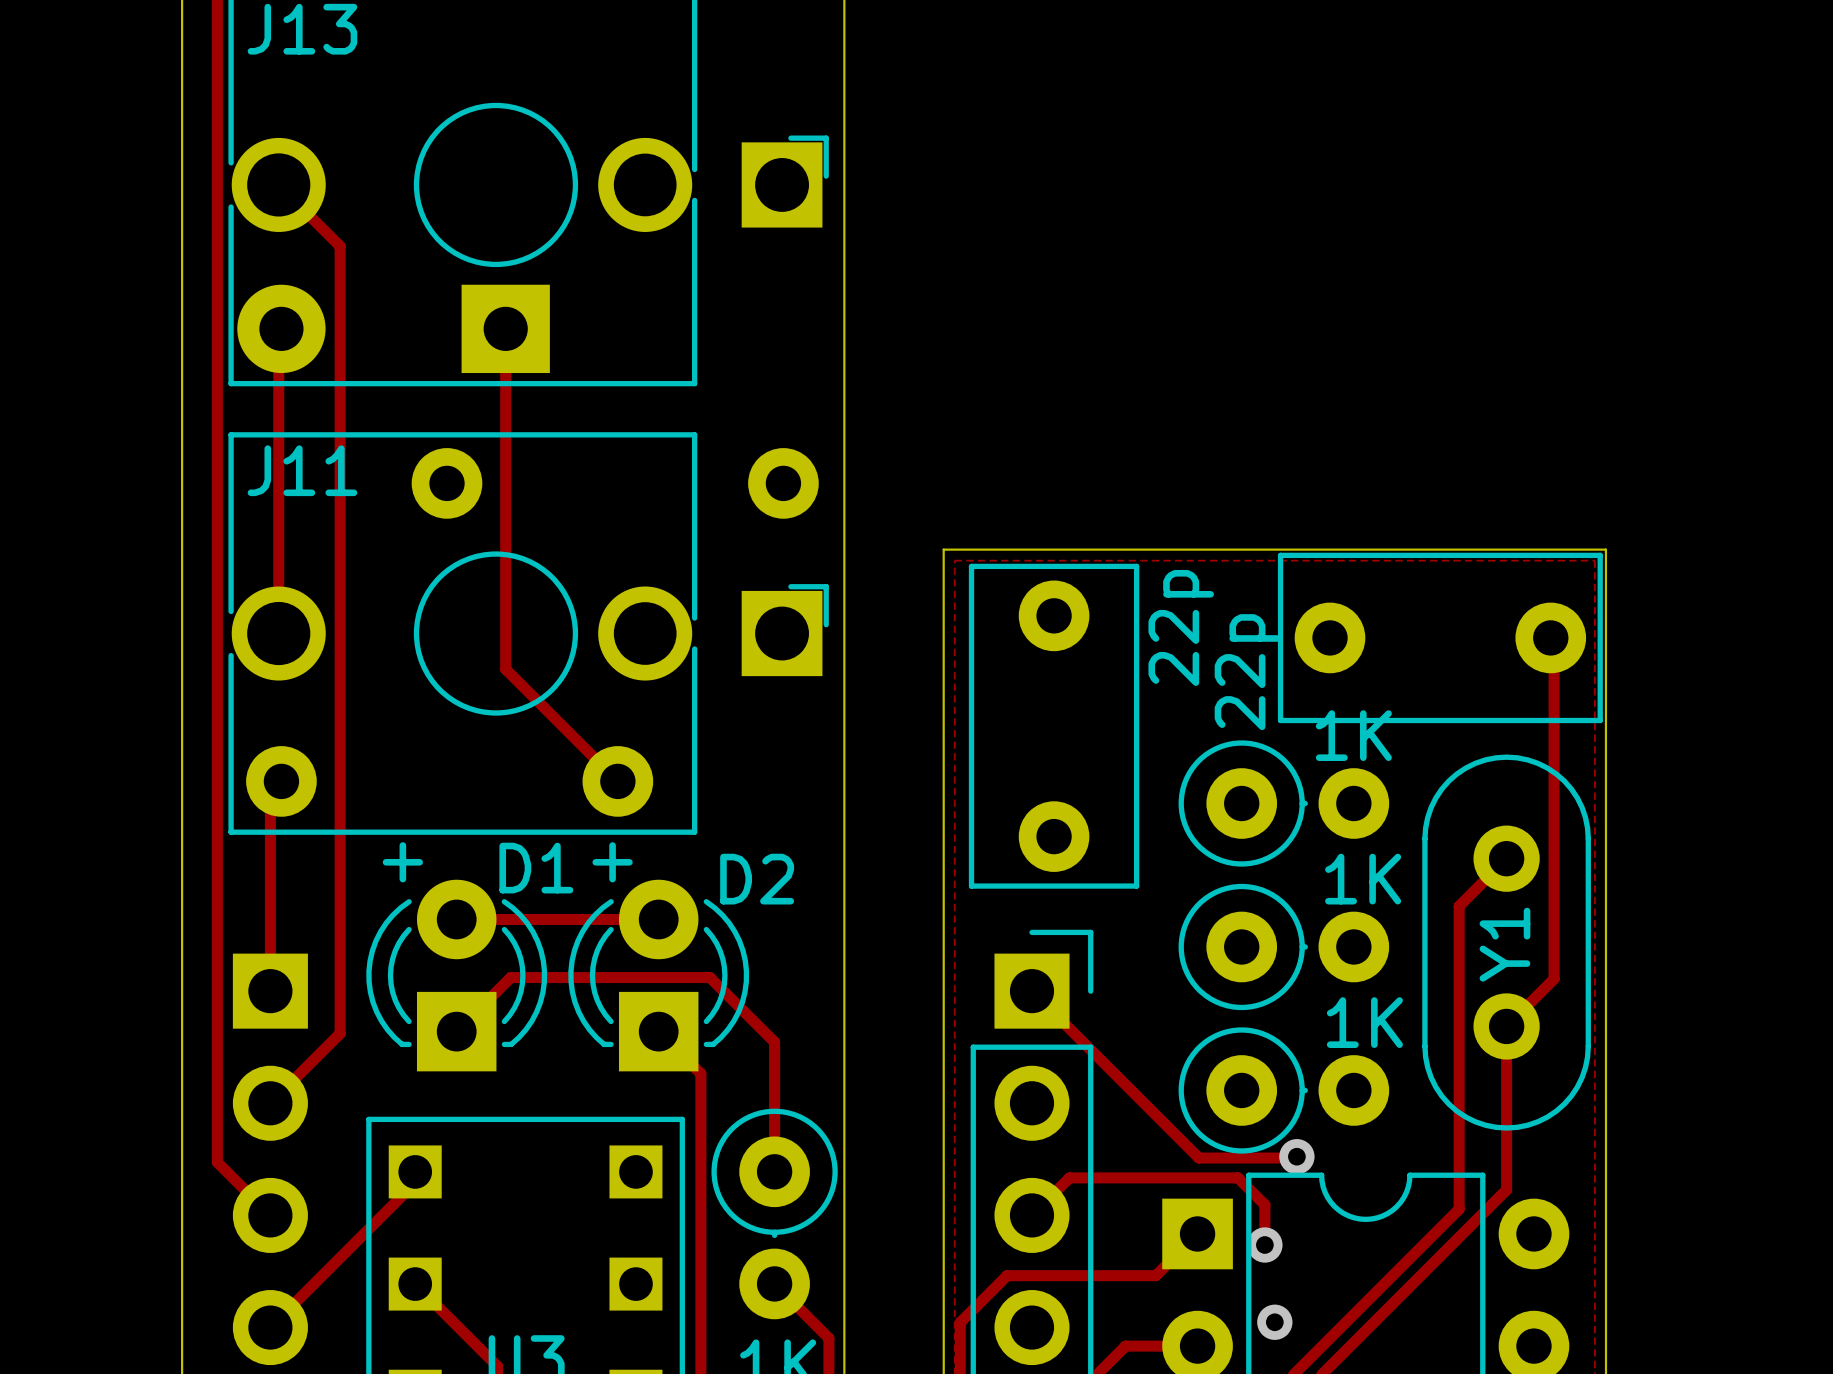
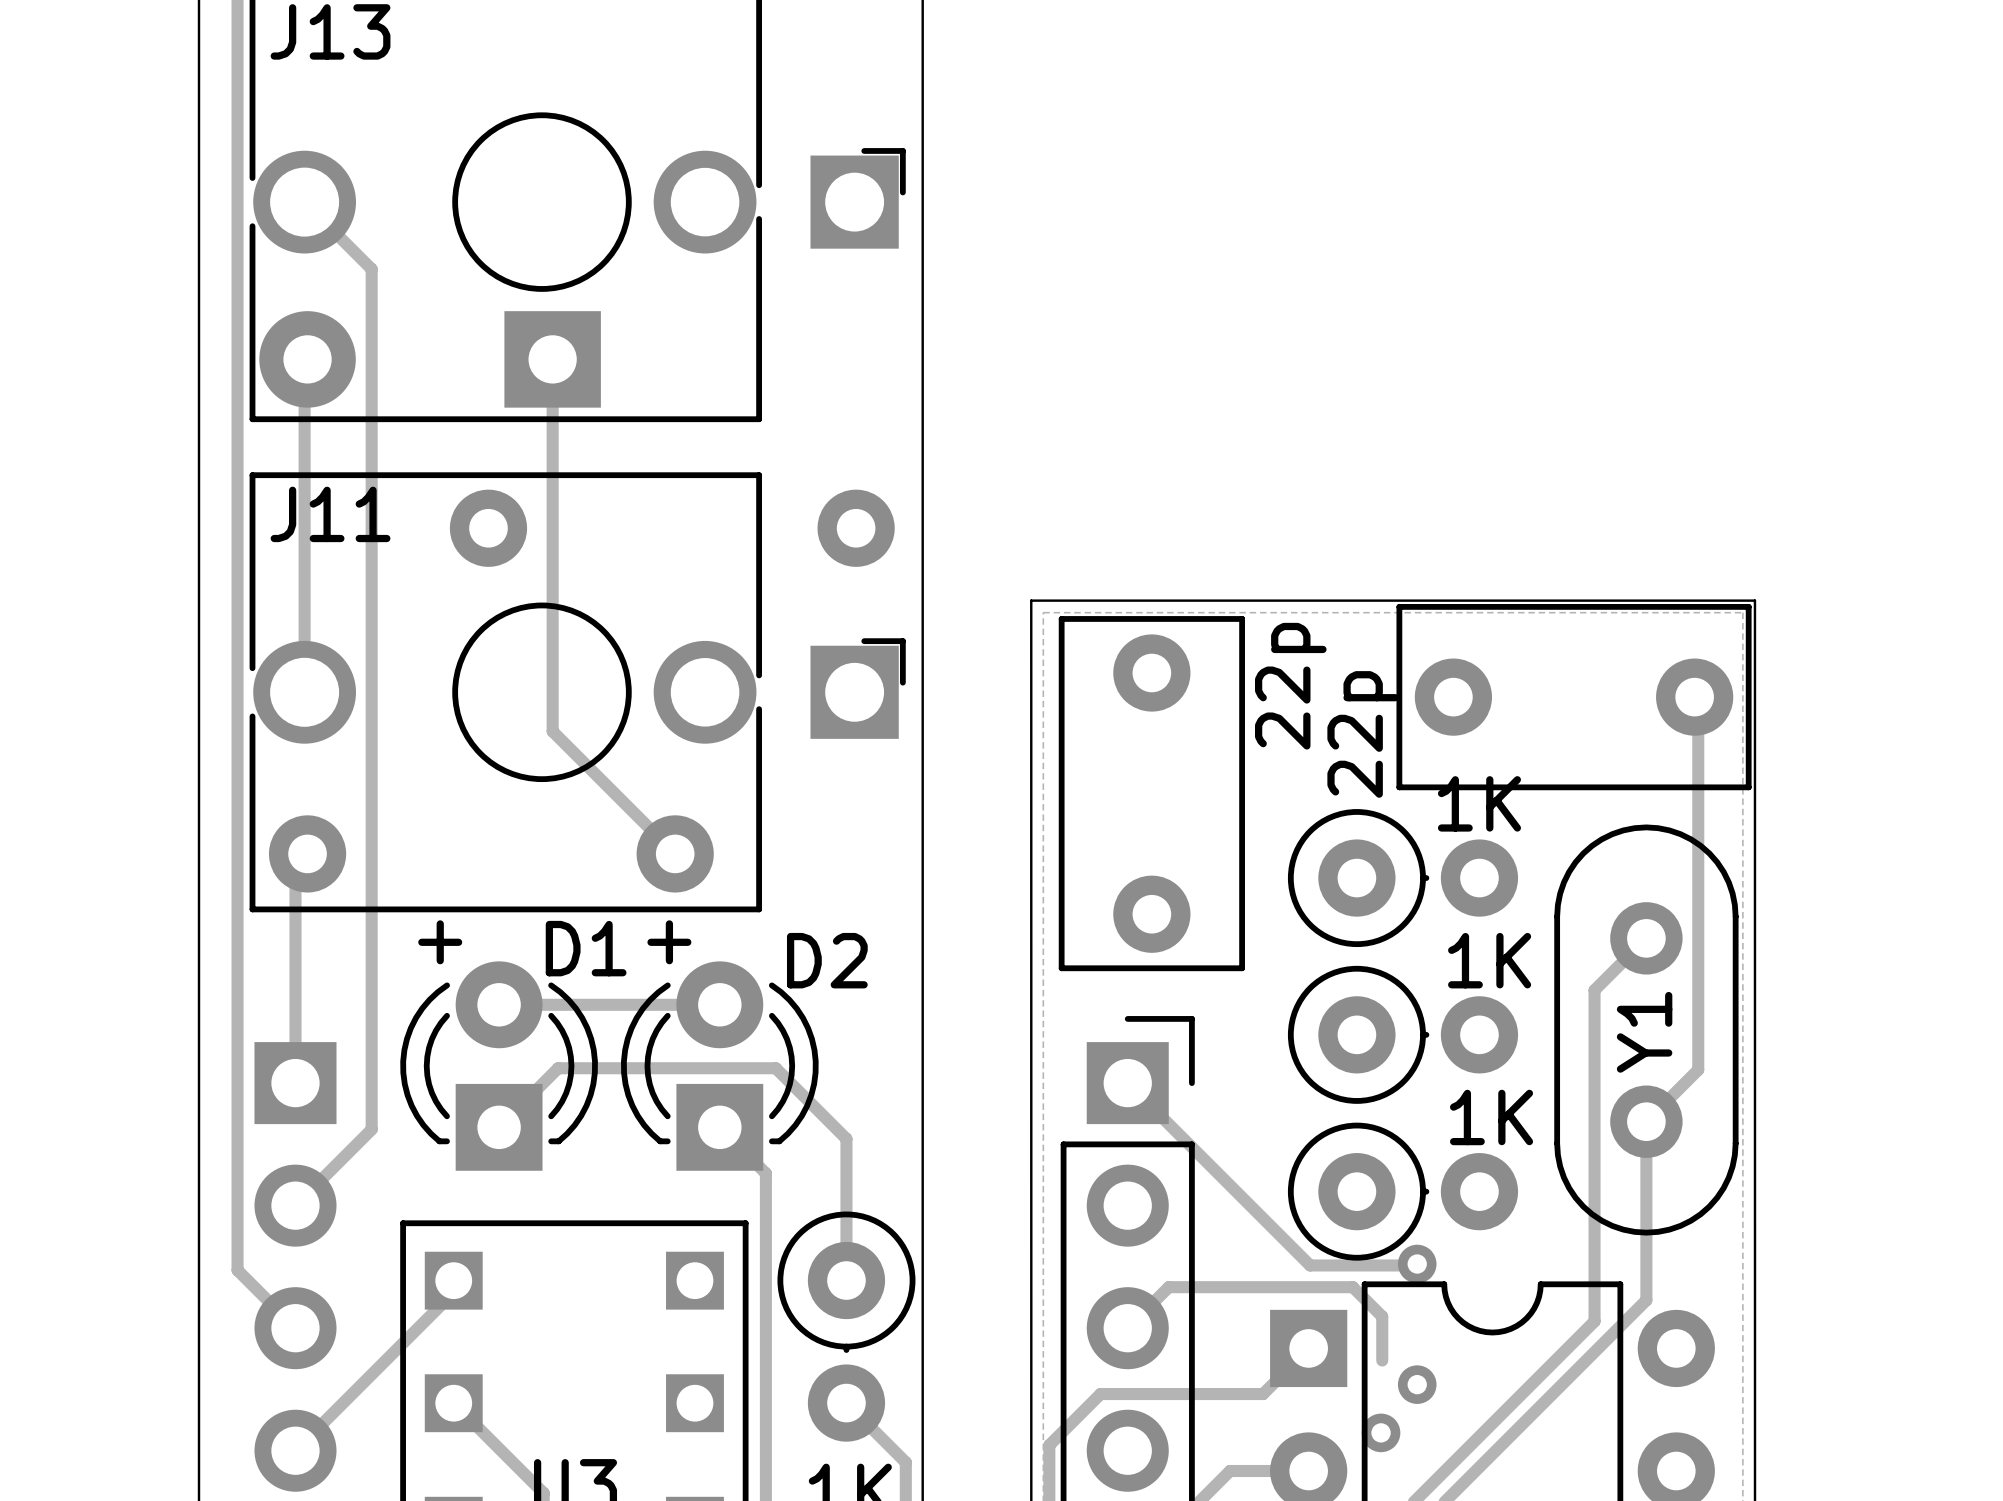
via position: (1264, 1245) -> (1417, 1384)
via position: (1274, 1322) -> (1381, 1432)

